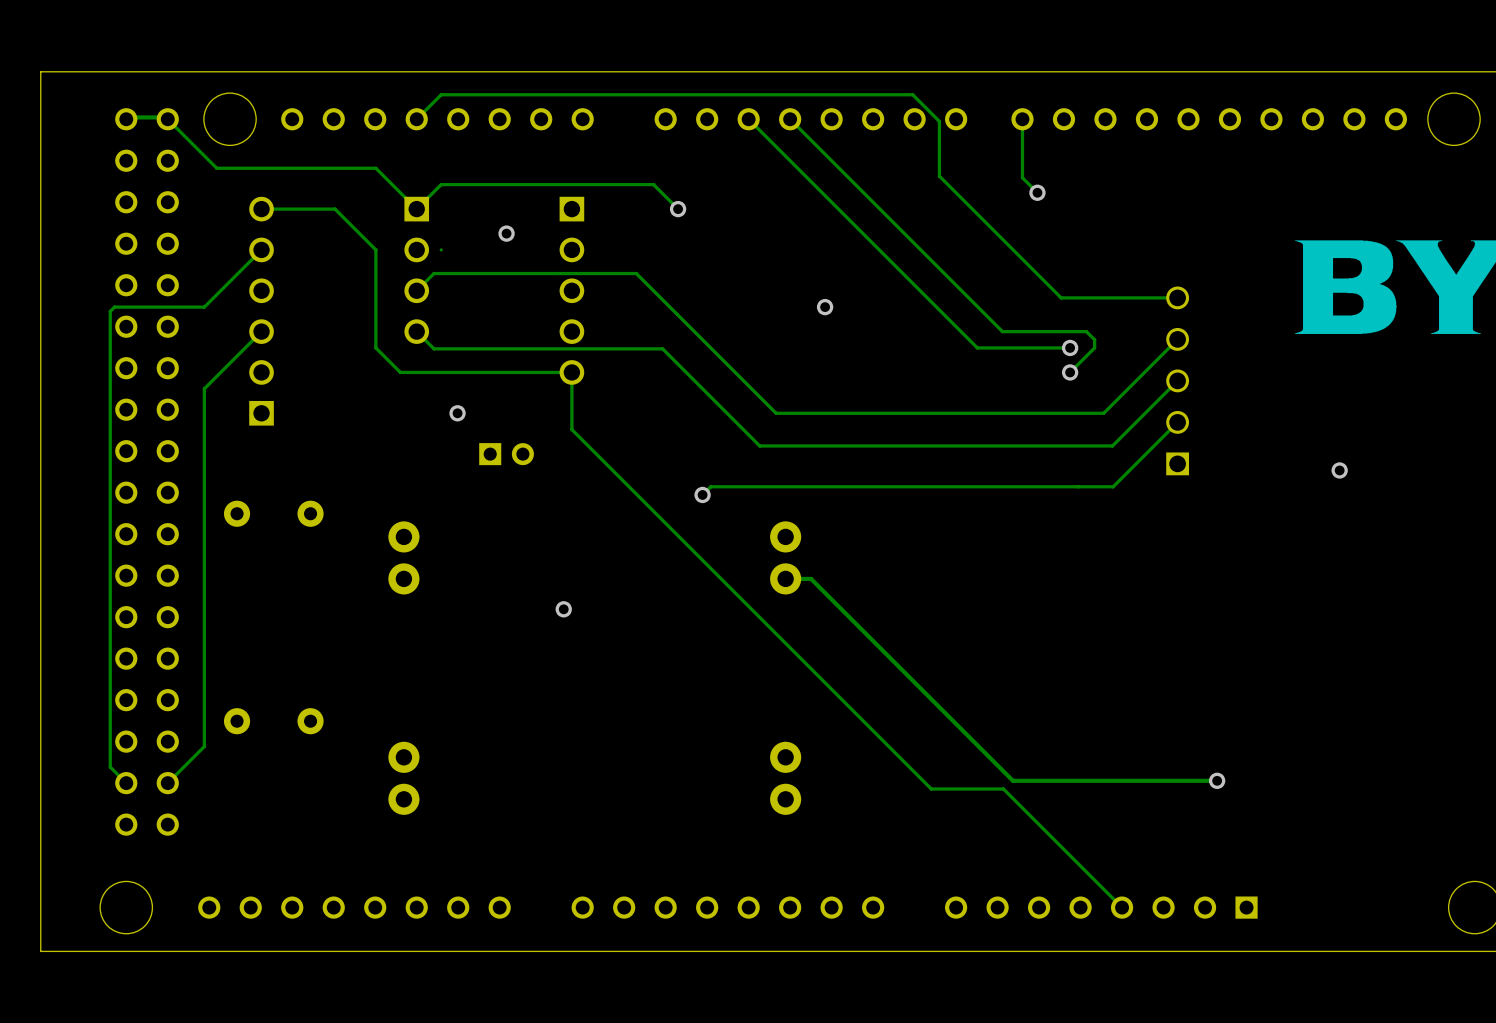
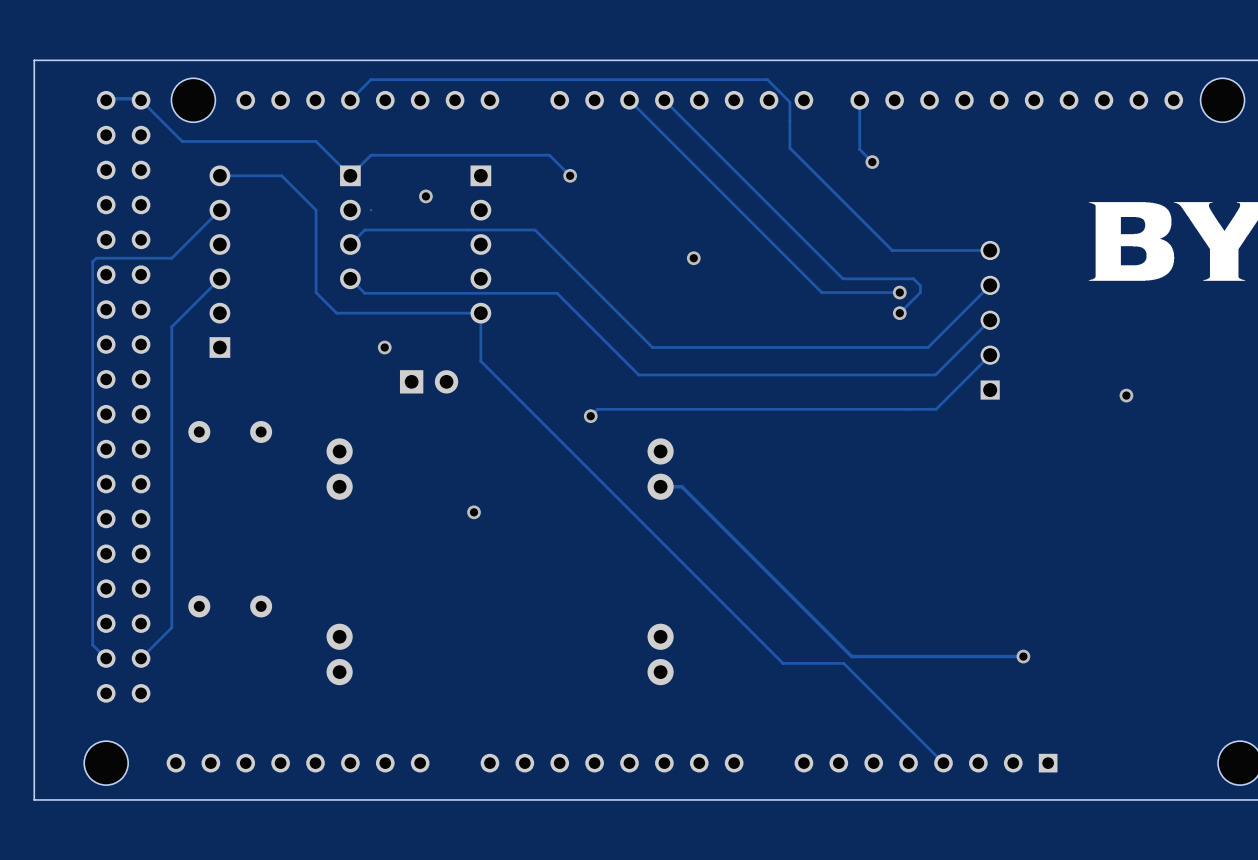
part footprint: [479, 443, 534, 466] -> [399, 370, 459, 394]

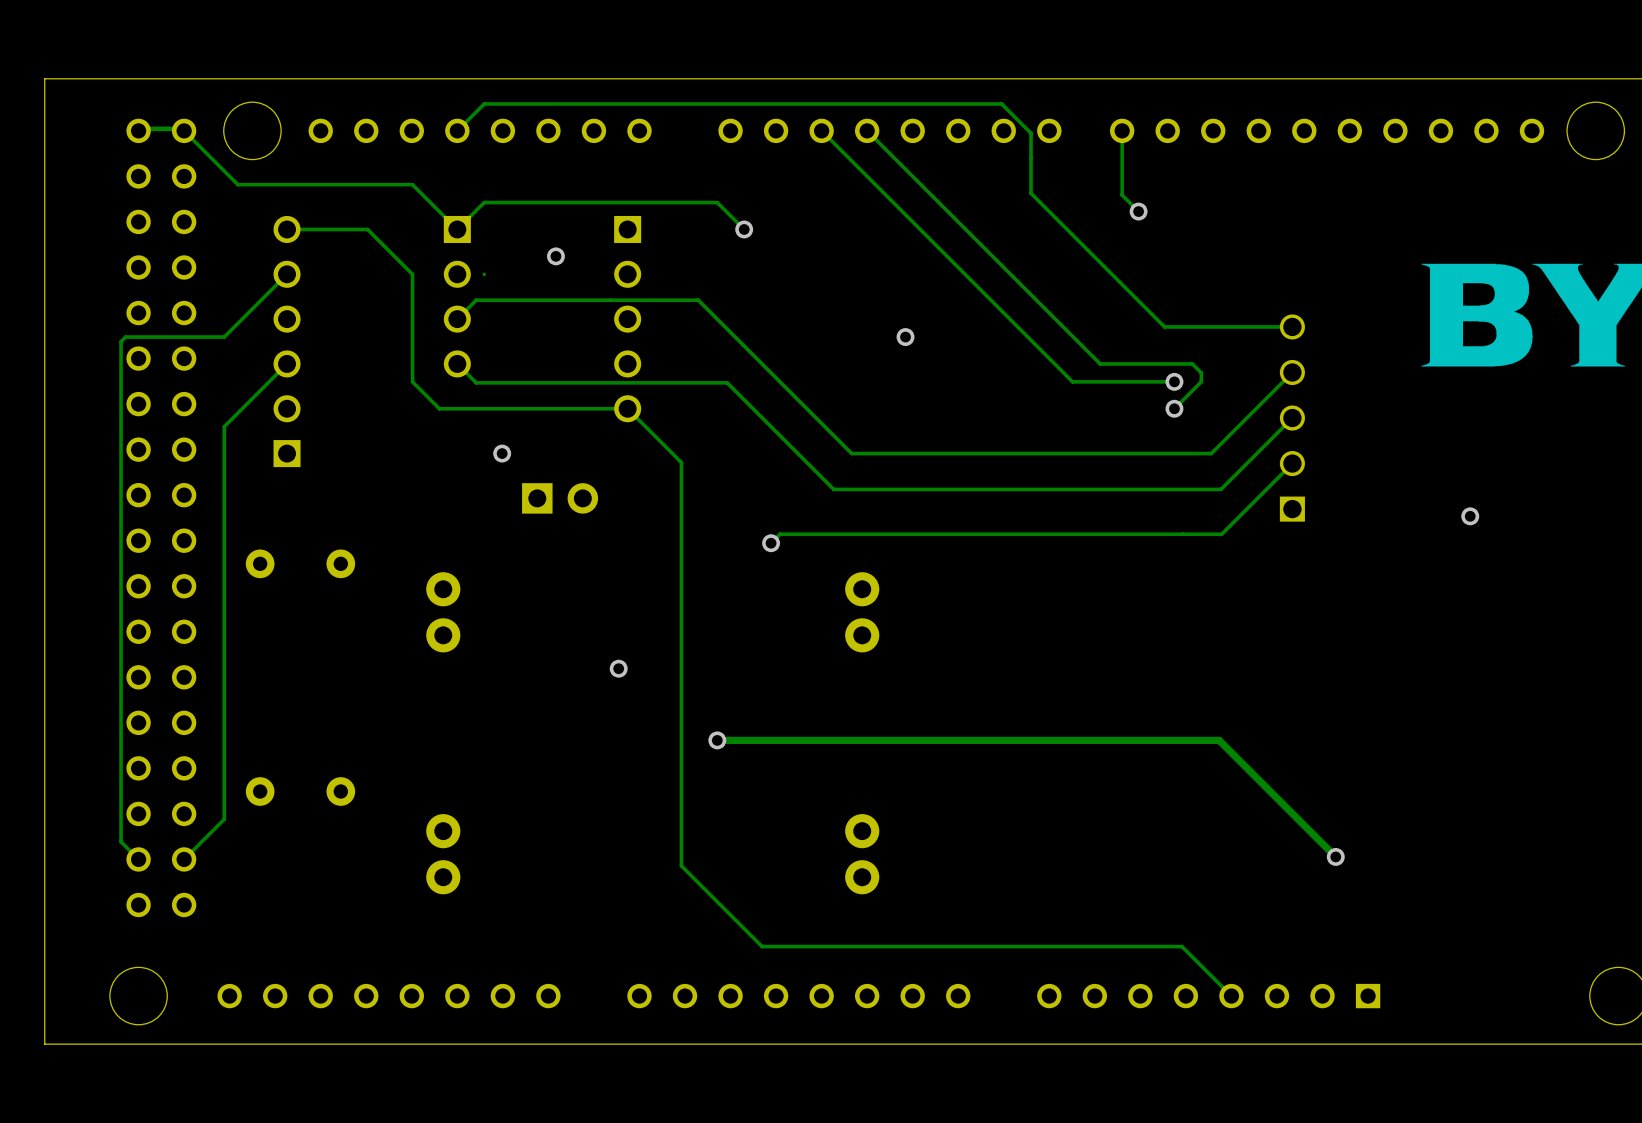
track: (480, 313) (480, 361) (783, 663) (843, 663) (905, 725) -> (627, 408) (681, 462) (681, 865) (762, 946) (1181, 946)
track: (660, 486) (681, 486) (851, 656) (1023, 656) -> (717, 740) (1219, 740) (1335, 856)
via: none -> (717, 740)

